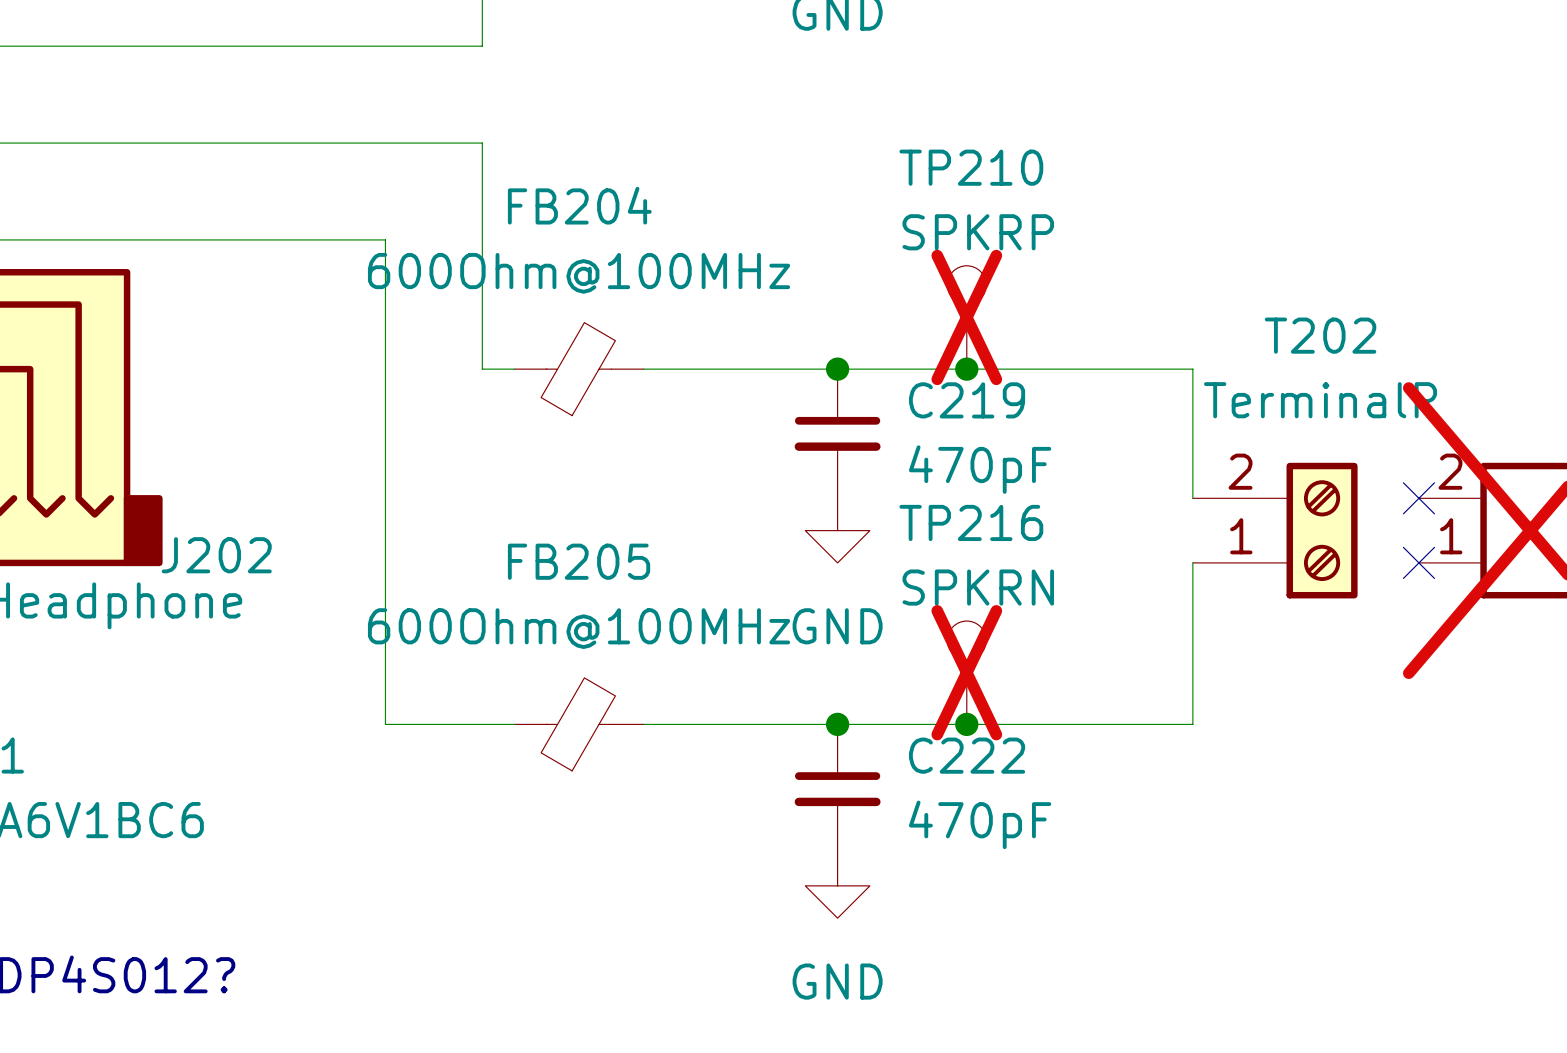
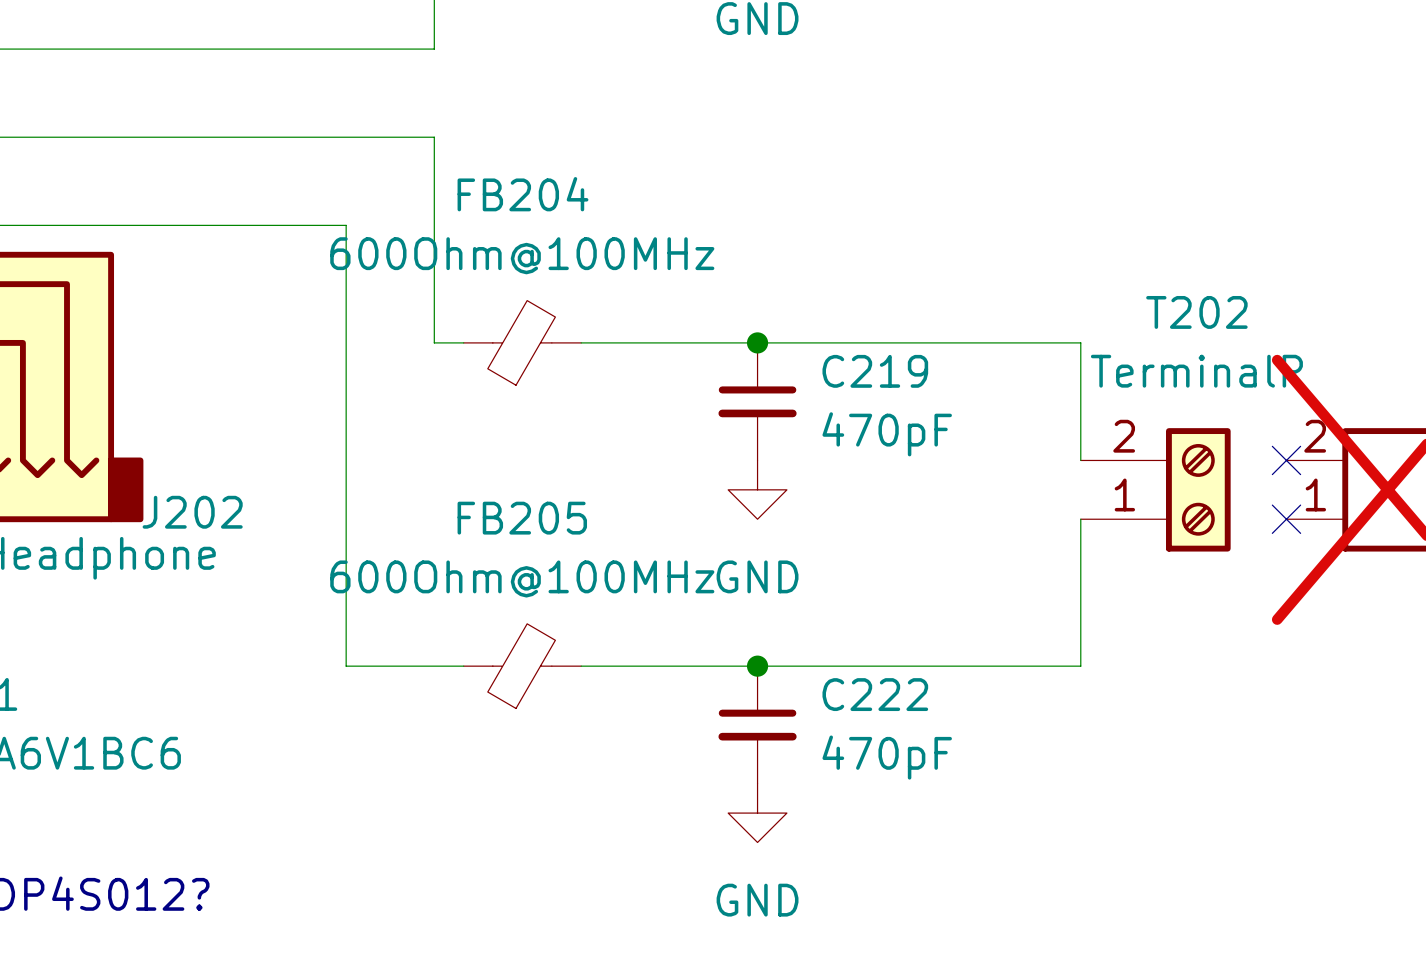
TP210: SPKRP (966, 317) -> none
junction: (966, 369) -> none
TP216: SPKRN (966, 672) -> none
junction: (966, 724) -> none

